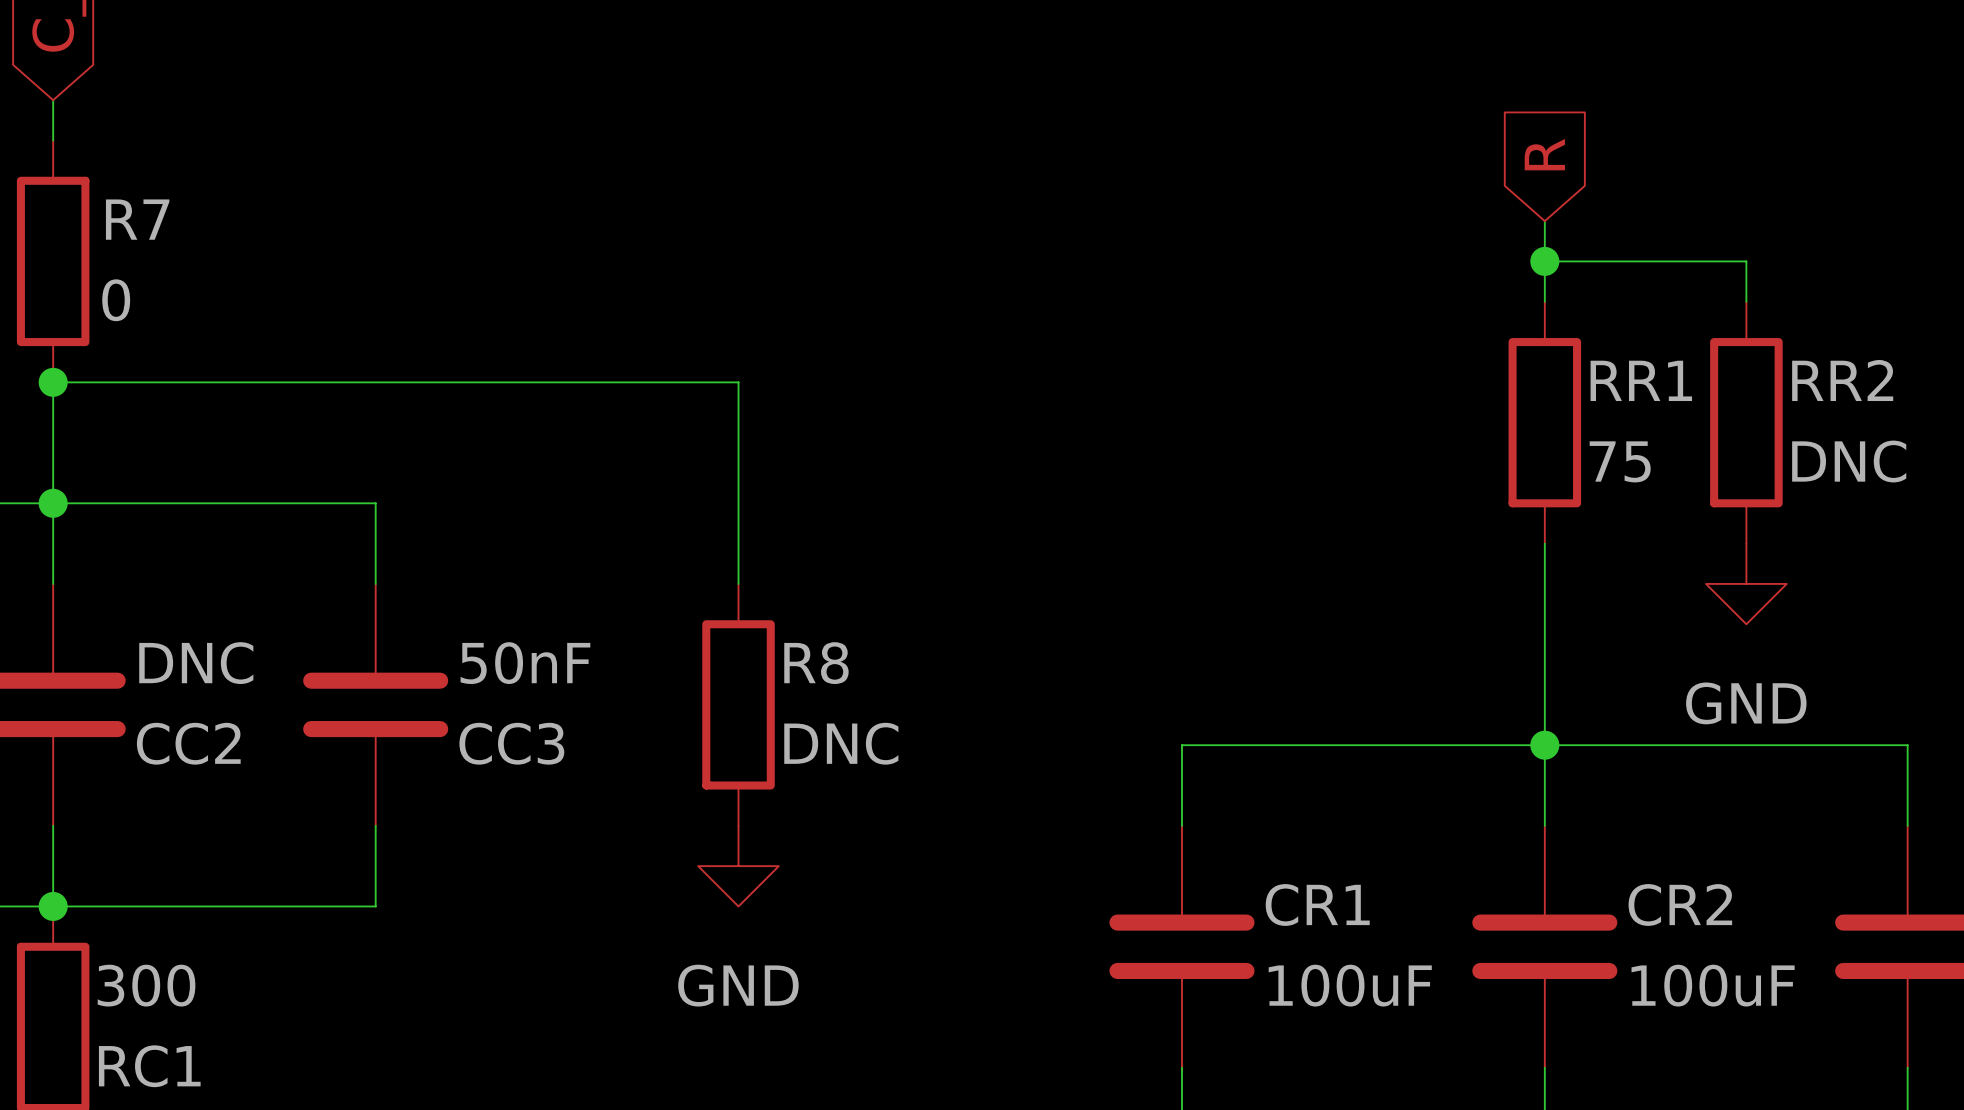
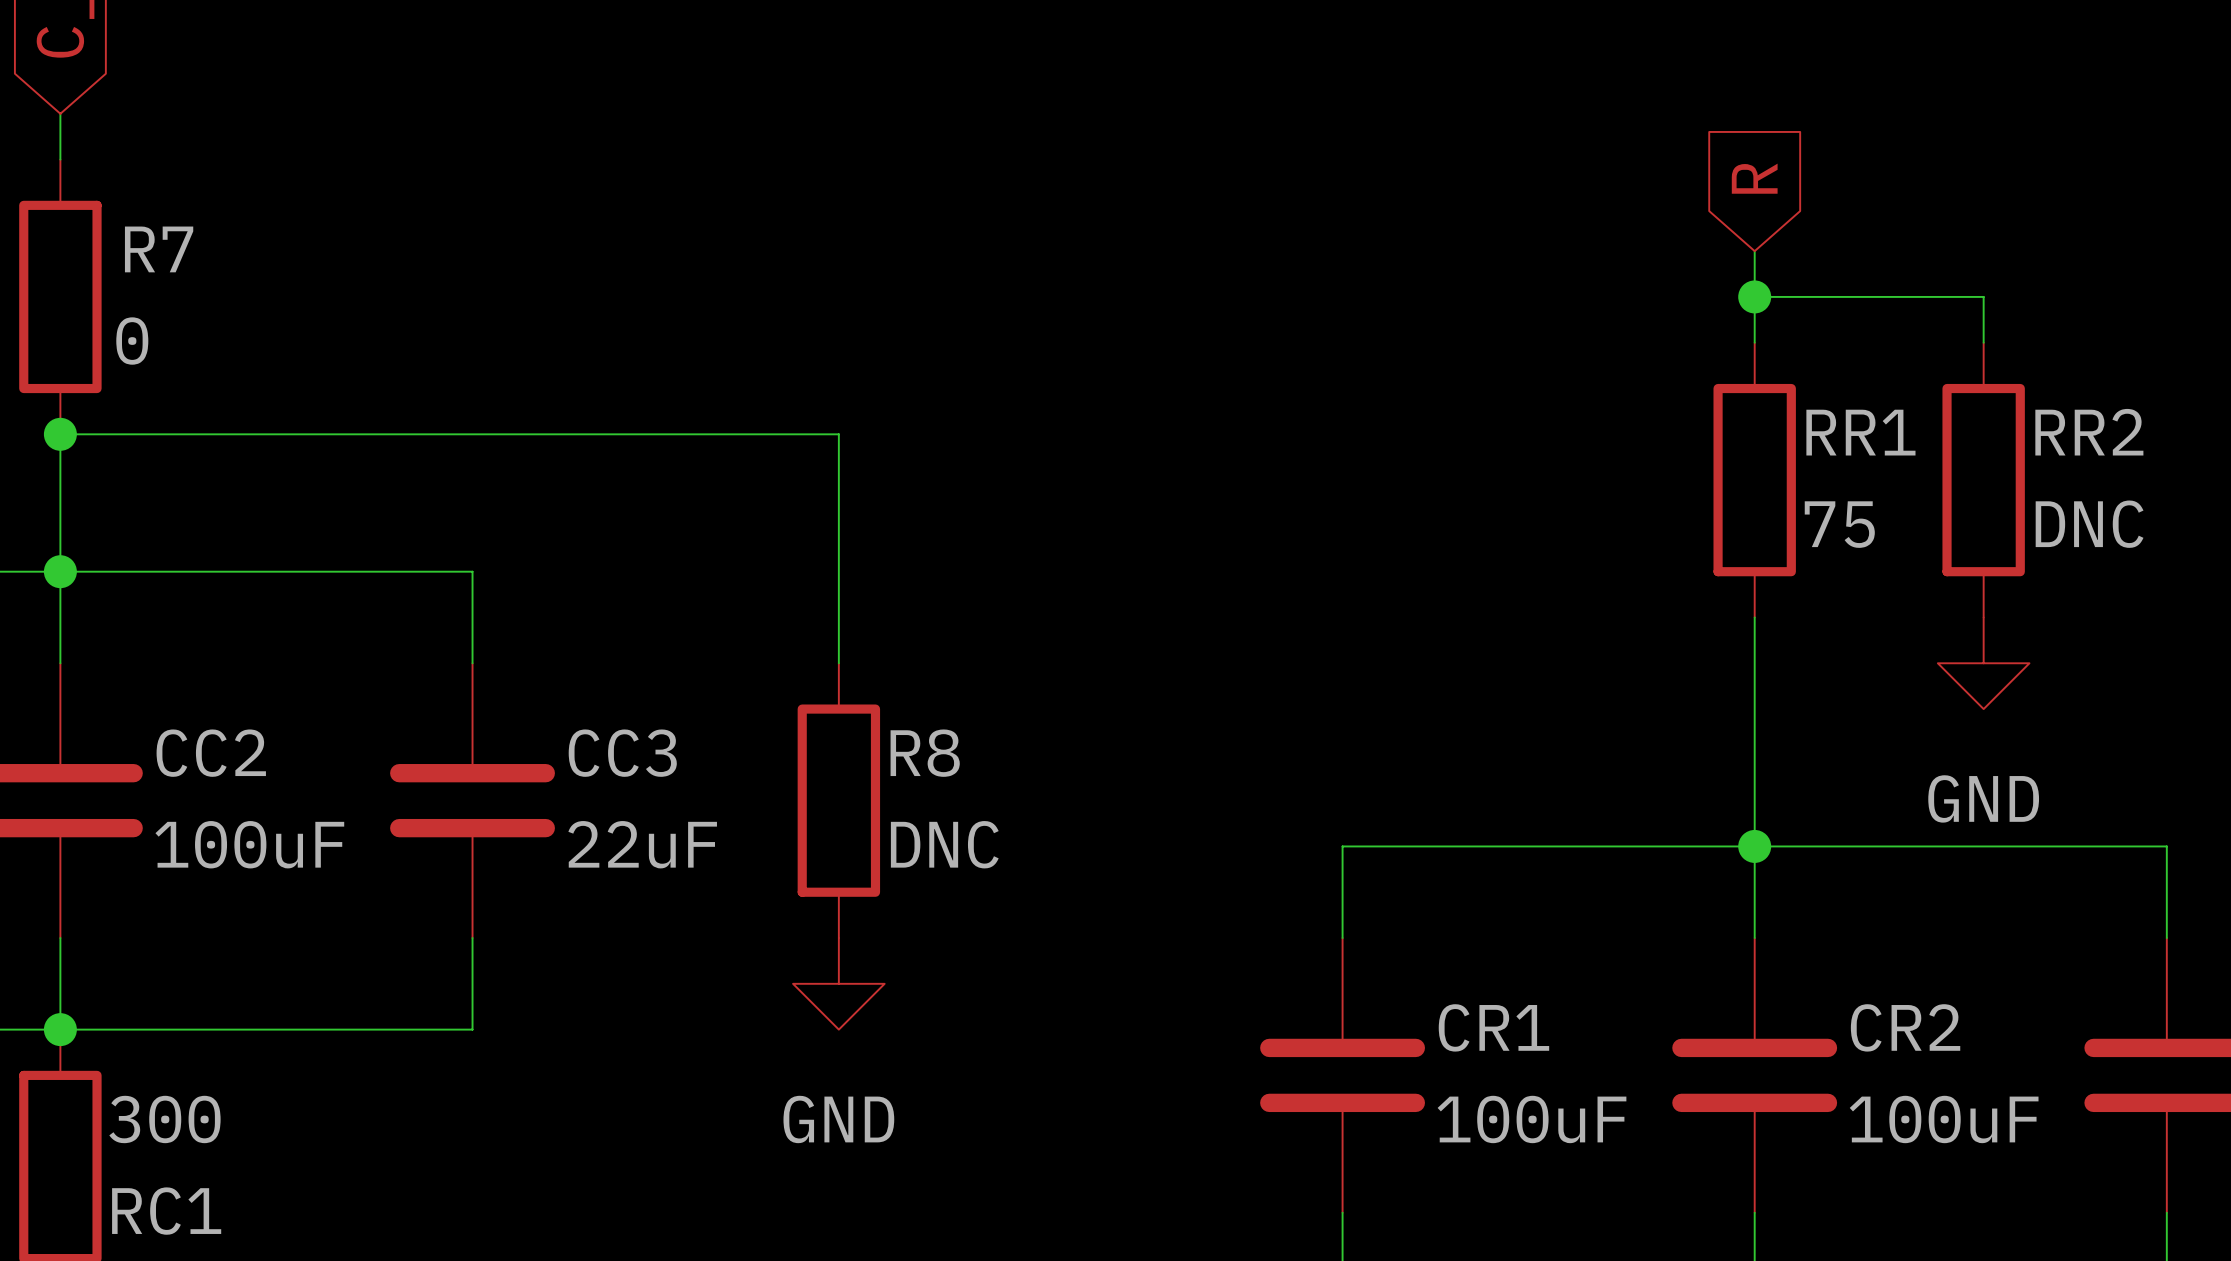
wire: (375, 503) (375, 583) -> (426, 571) (472, 571) (472, 663)
CC2 value: DNC (196, 663) -> 100uF (249, 844)
CC3 value: 50nF (525, 663) -> 22uF (642, 844)
CC3 position: (375, 704) -> (472, 800)
CC2 name position: CC2 (188, 743) -> CC2 (211, 753)
CC3 name position: CC3 (511, 743) -> CC3 (622, 753)
wire: (375, 825) (375, 906) -> (472, 938) (472, 1029) (426, 1029)

